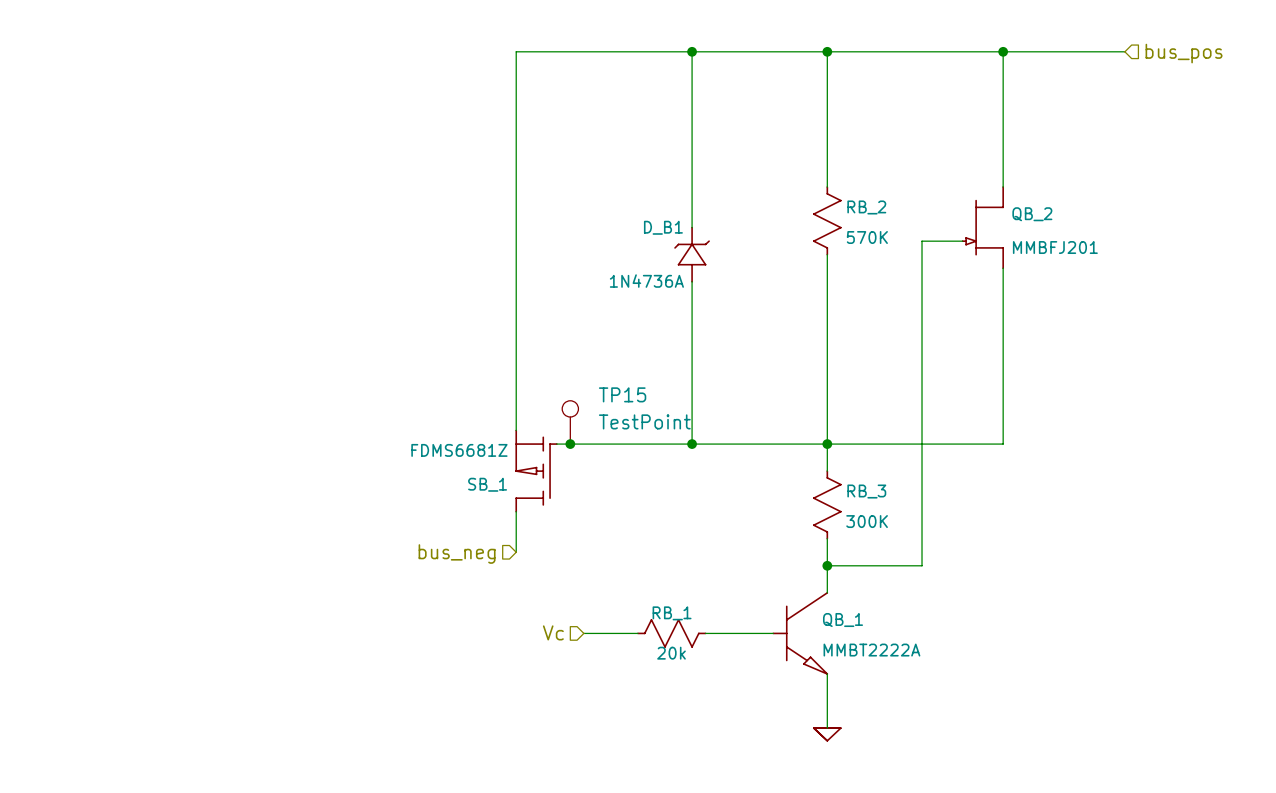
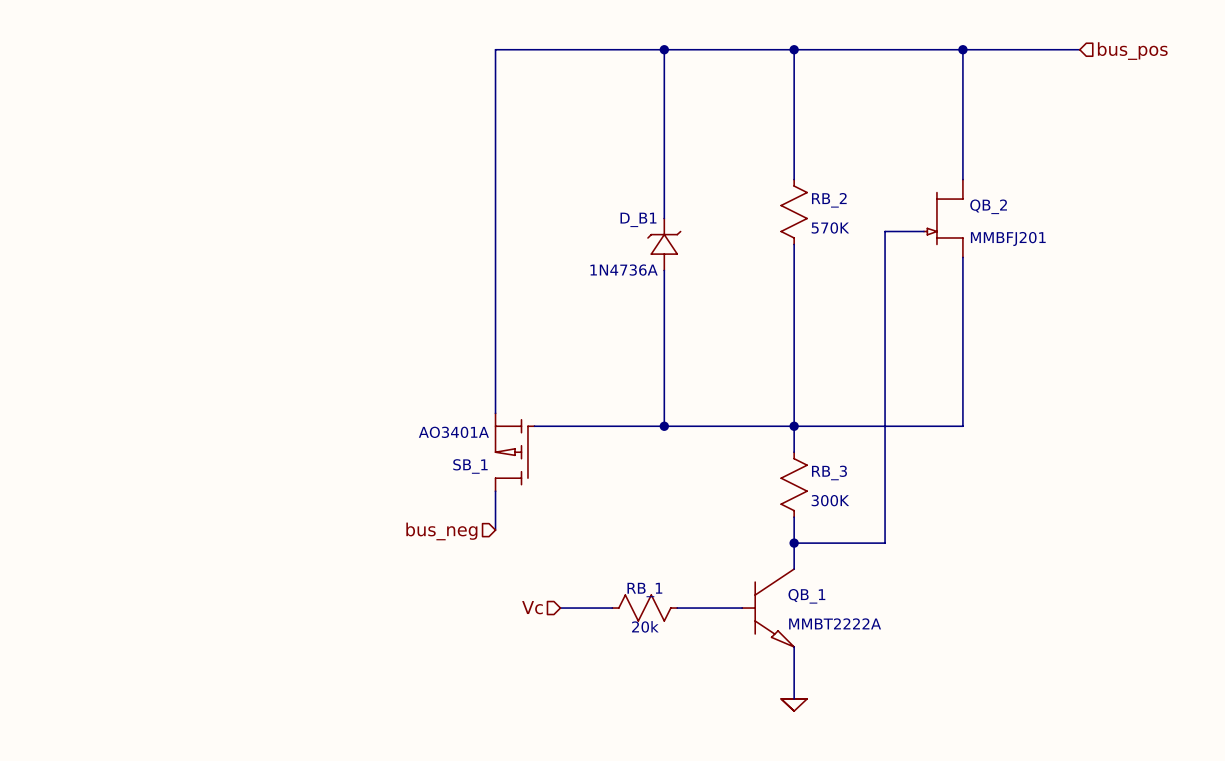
TP15: TestPoint (570, 422) -> none
junction: (570, 444) -> none
SB_1 value: FDMS6681Z (459, 450) -> AO3401A (453, 432)

